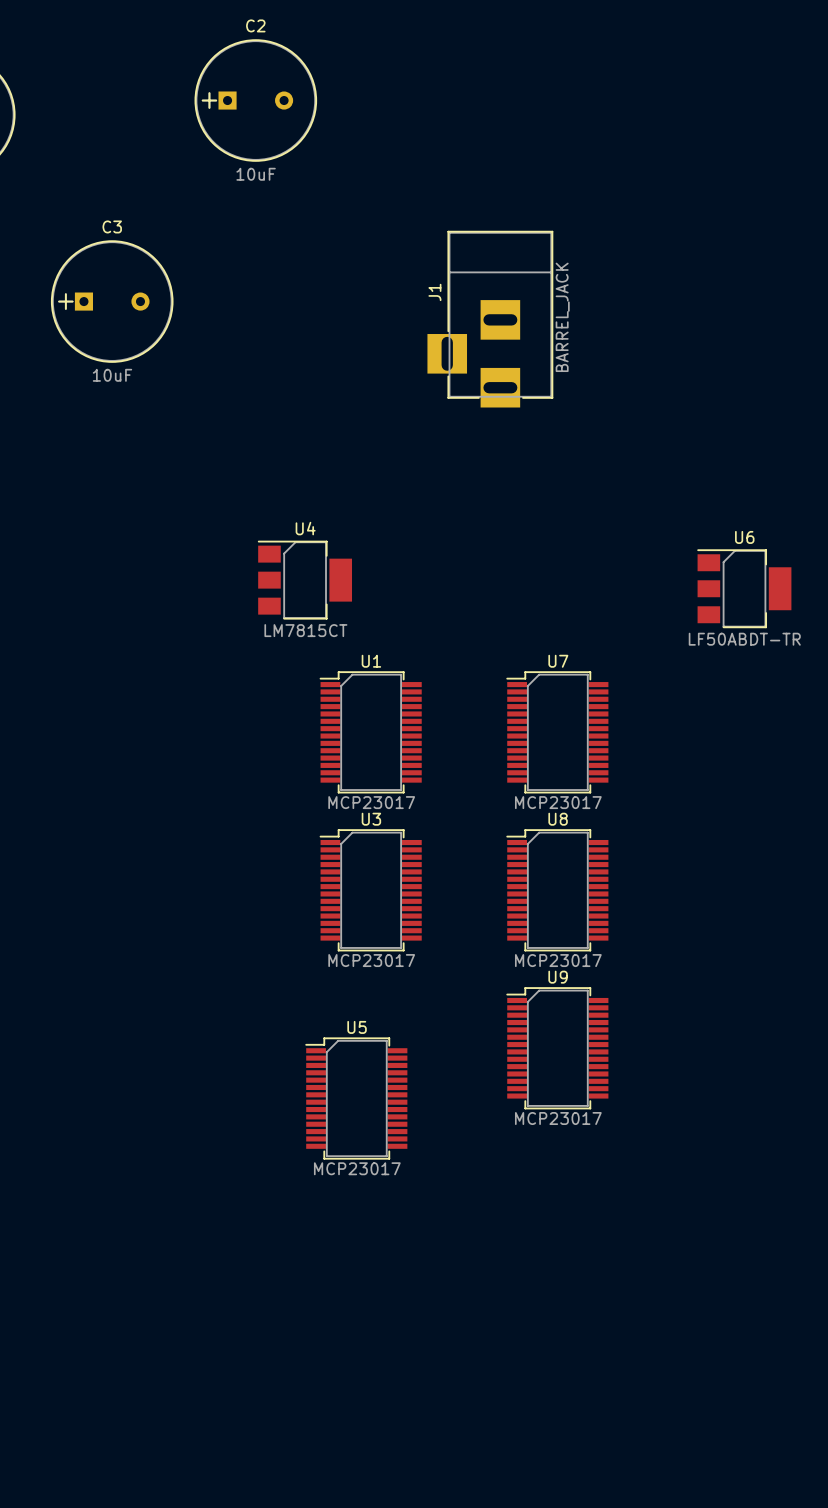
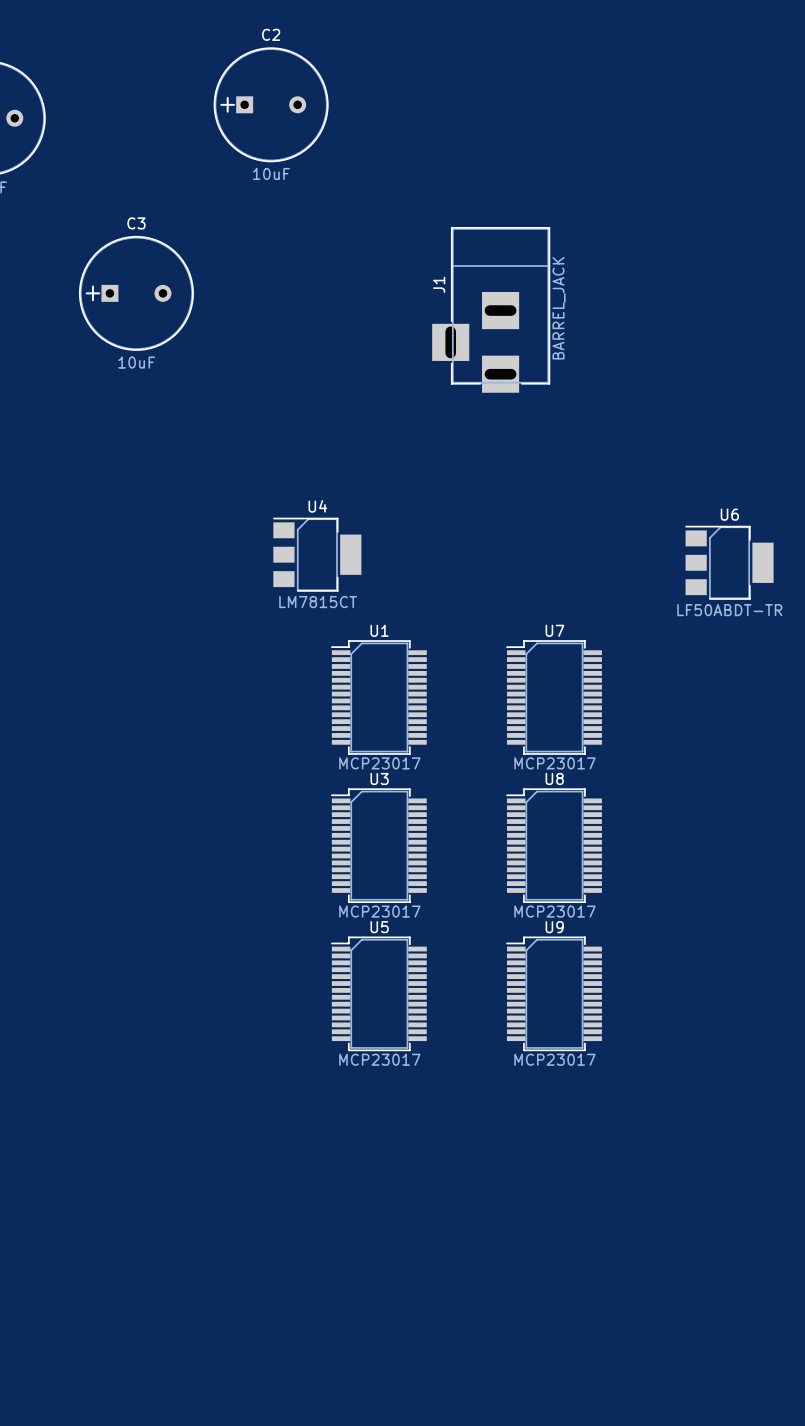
U5 position: (356, 1098) -> (378, 993)

